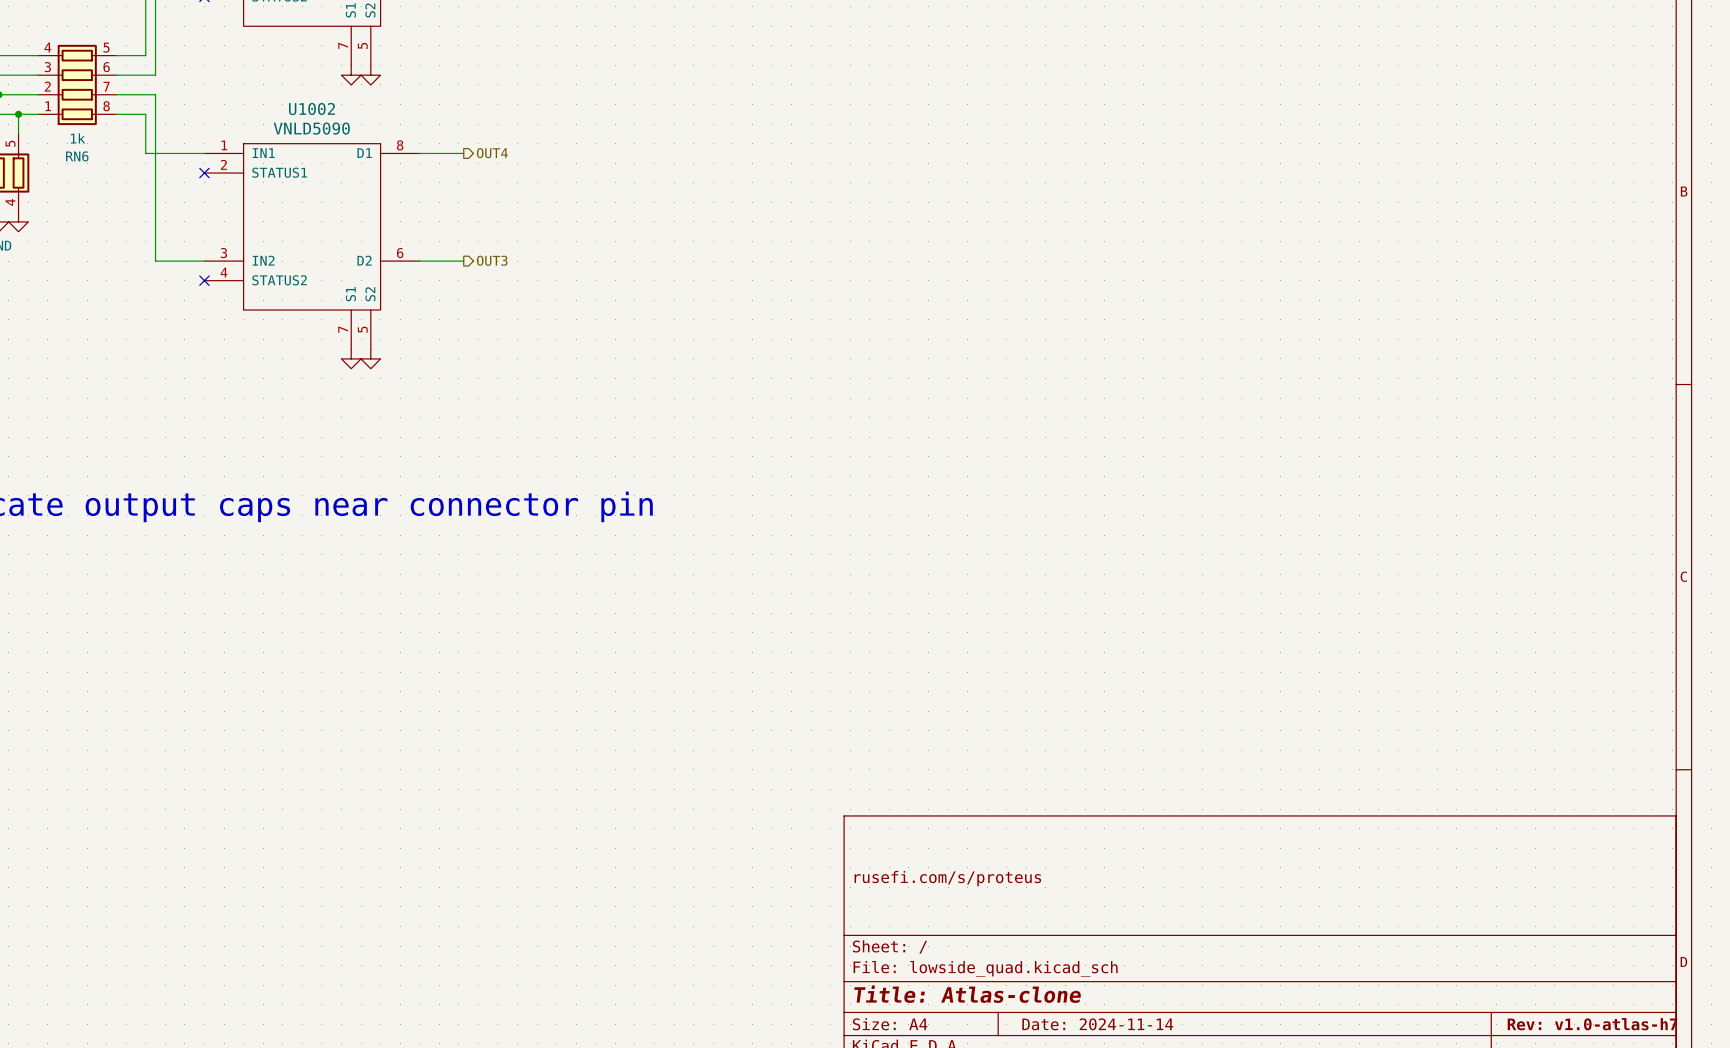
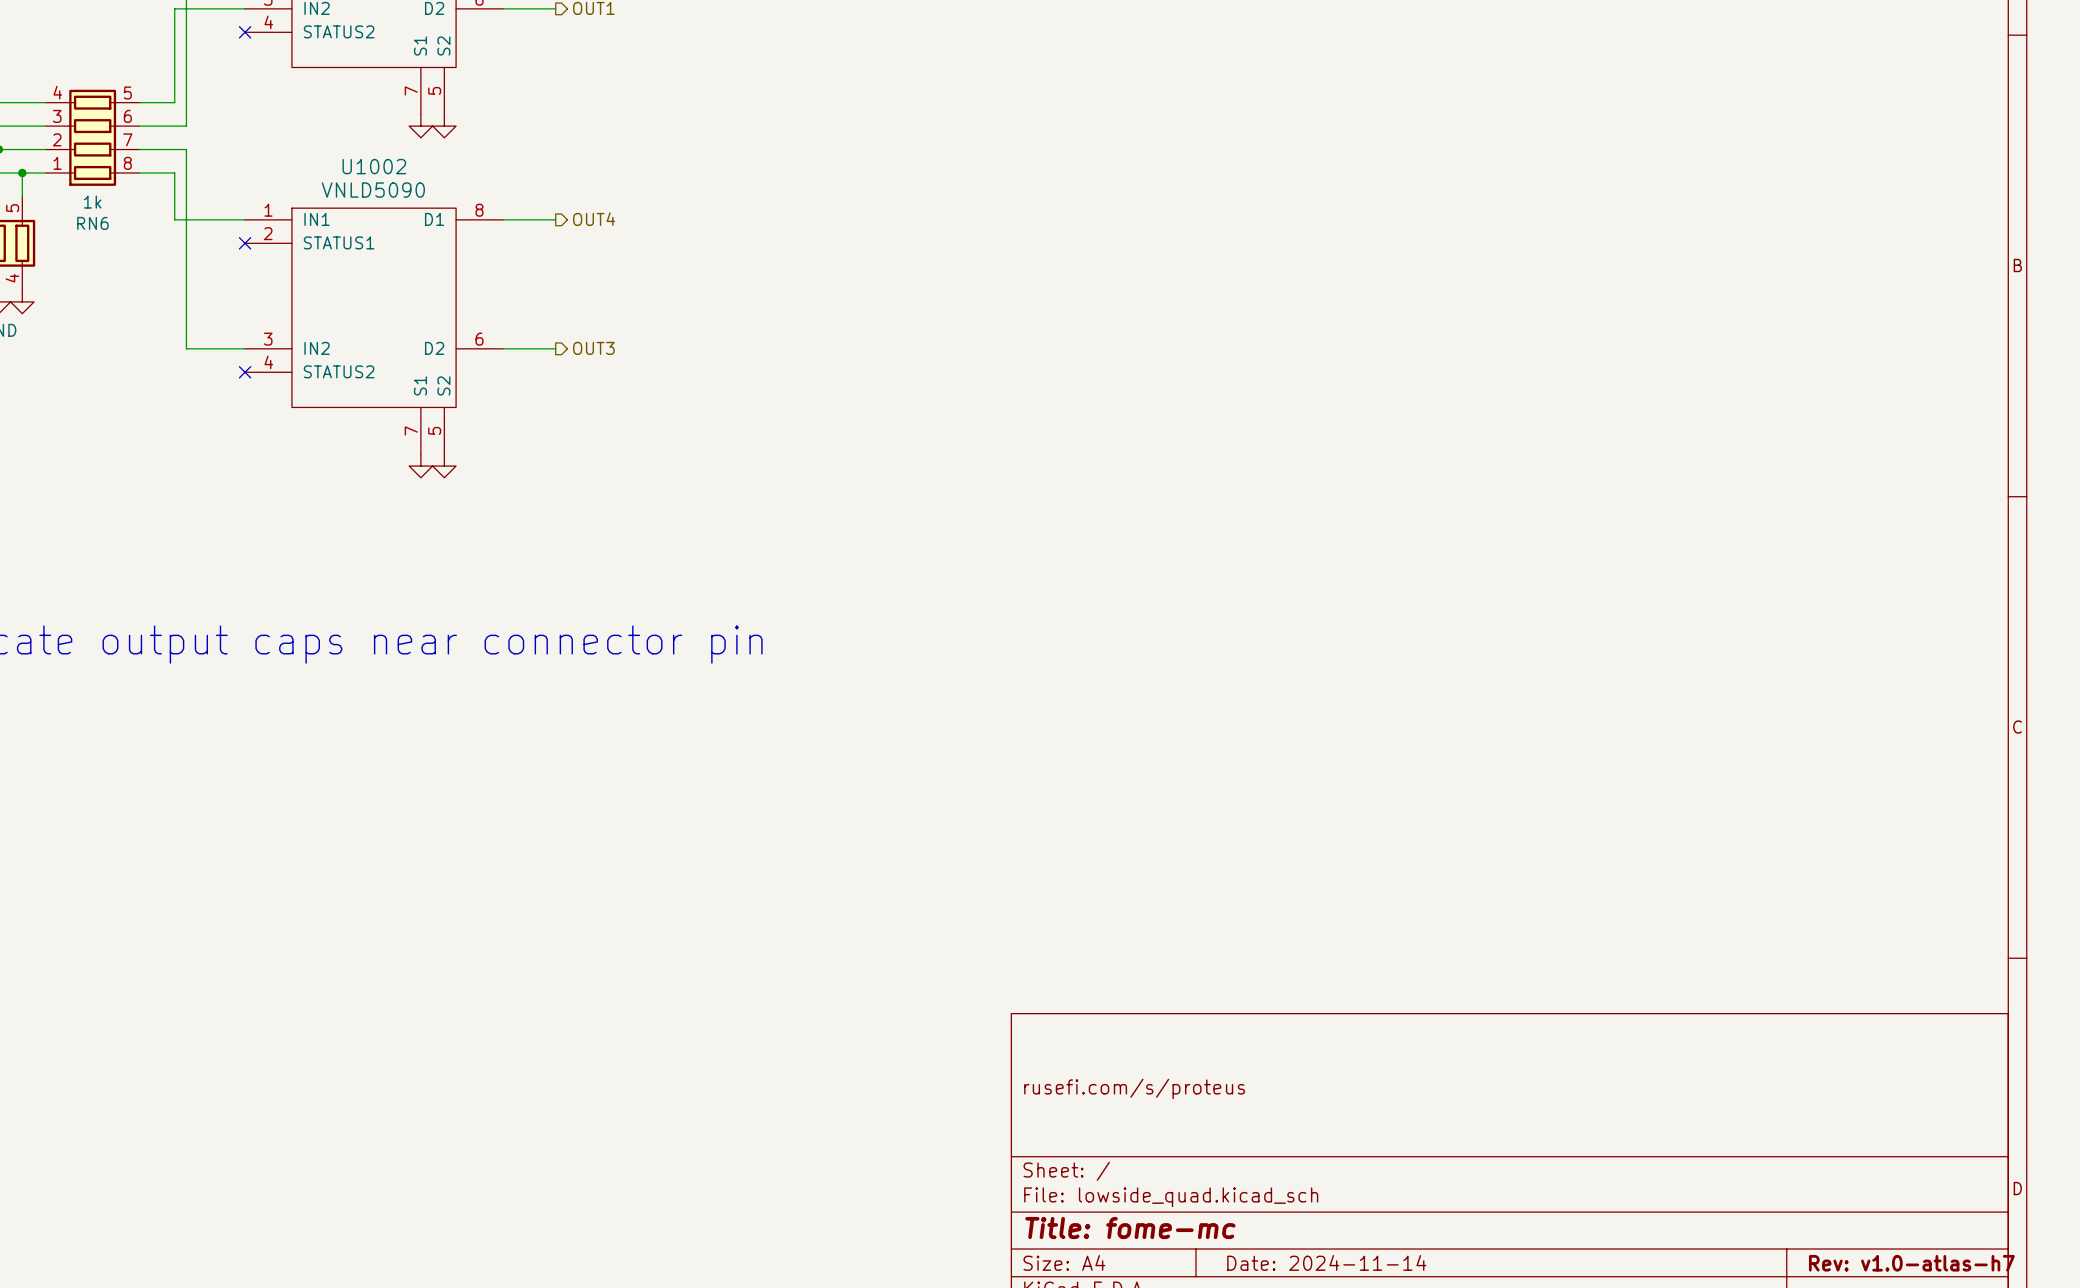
title block: Title: Atlas-clone (967, 994) -> Title: fome-mc (1130, 1228)

